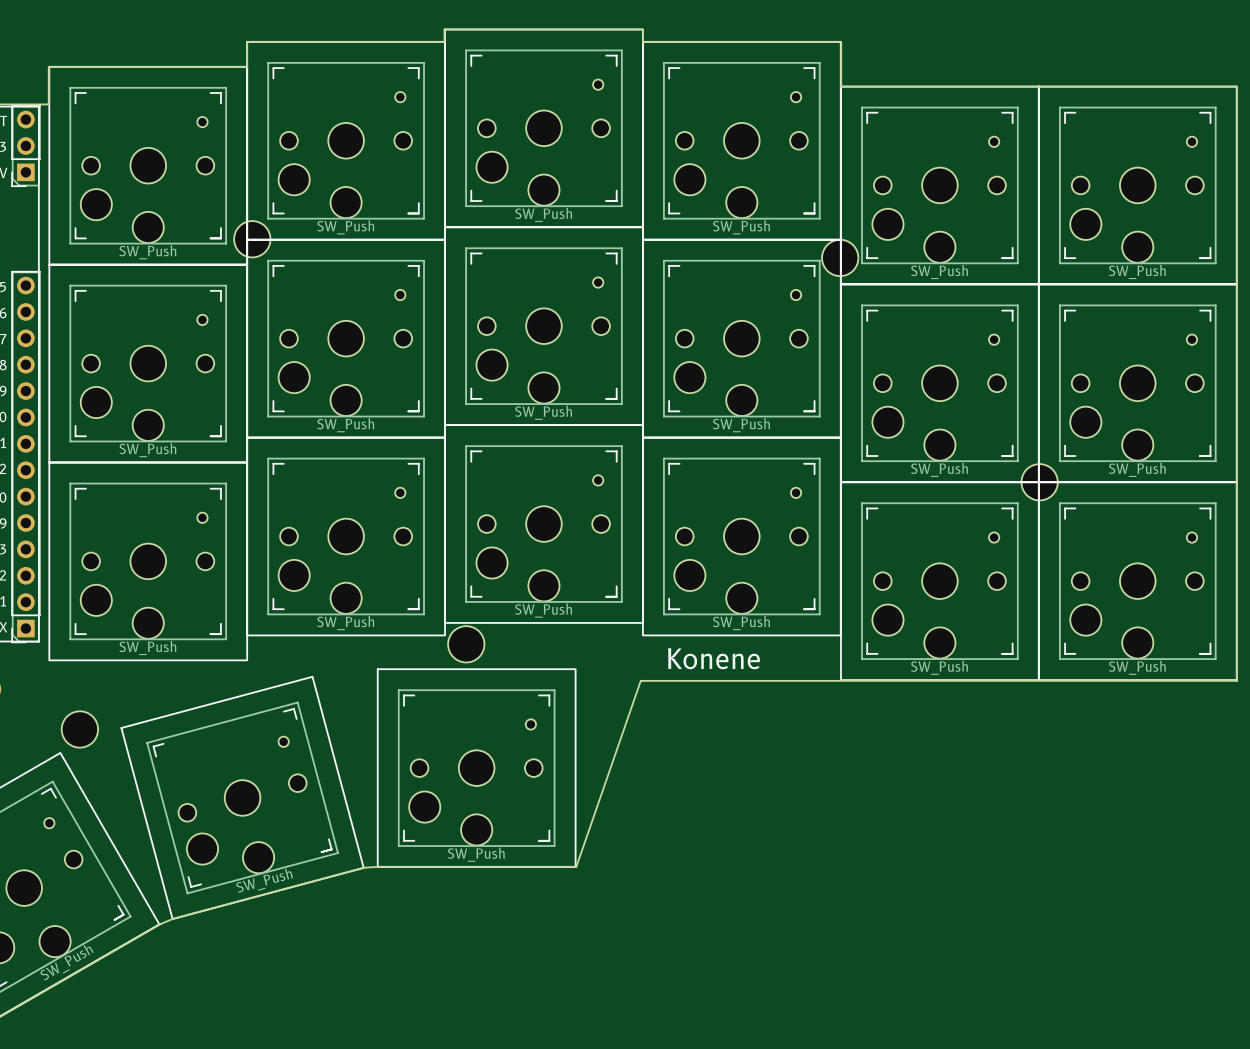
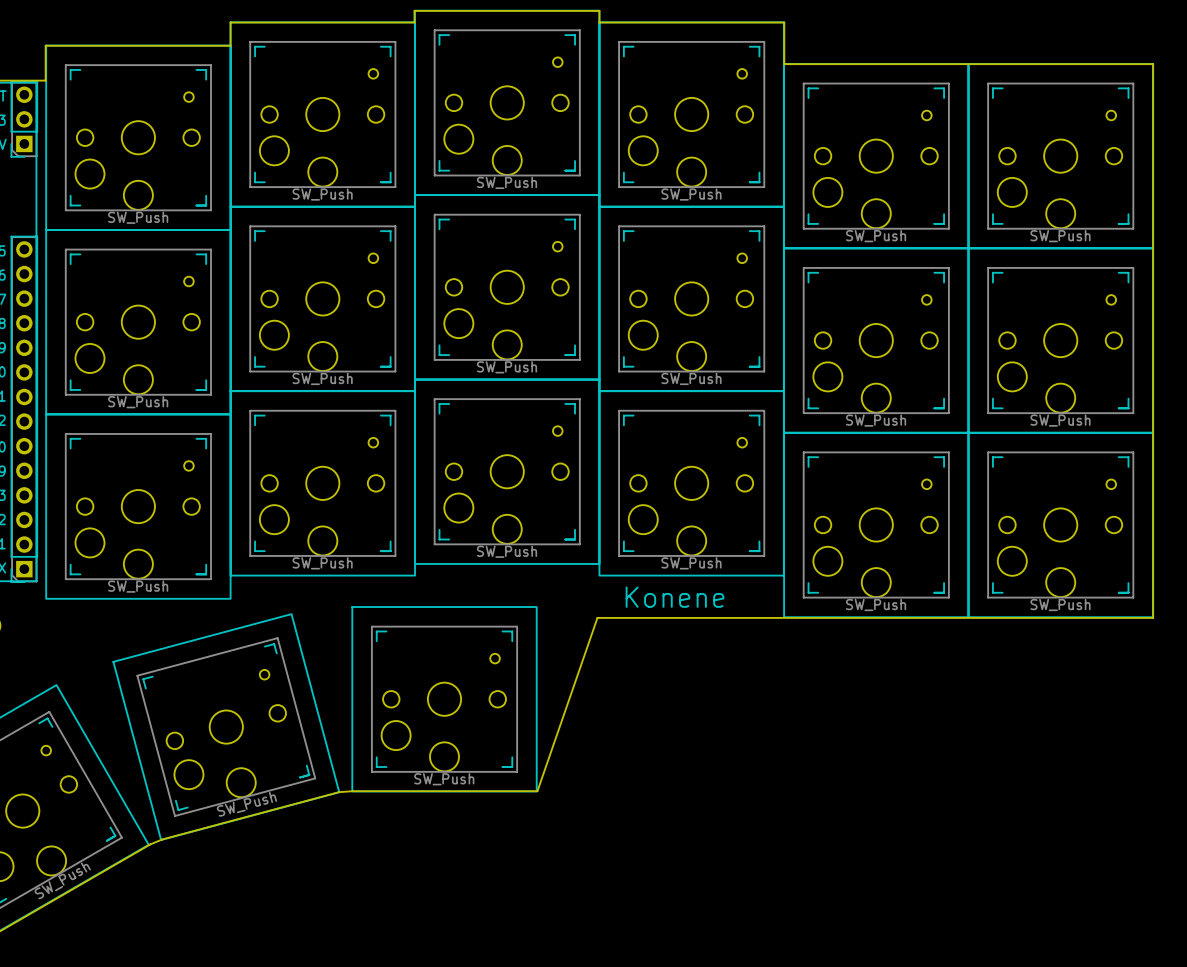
part: (252, 239) -> none
part: (840, 257) -> none
part: (1039, 482) -> none
part: (466, 644) -> none
part: (79, 729) -> none

